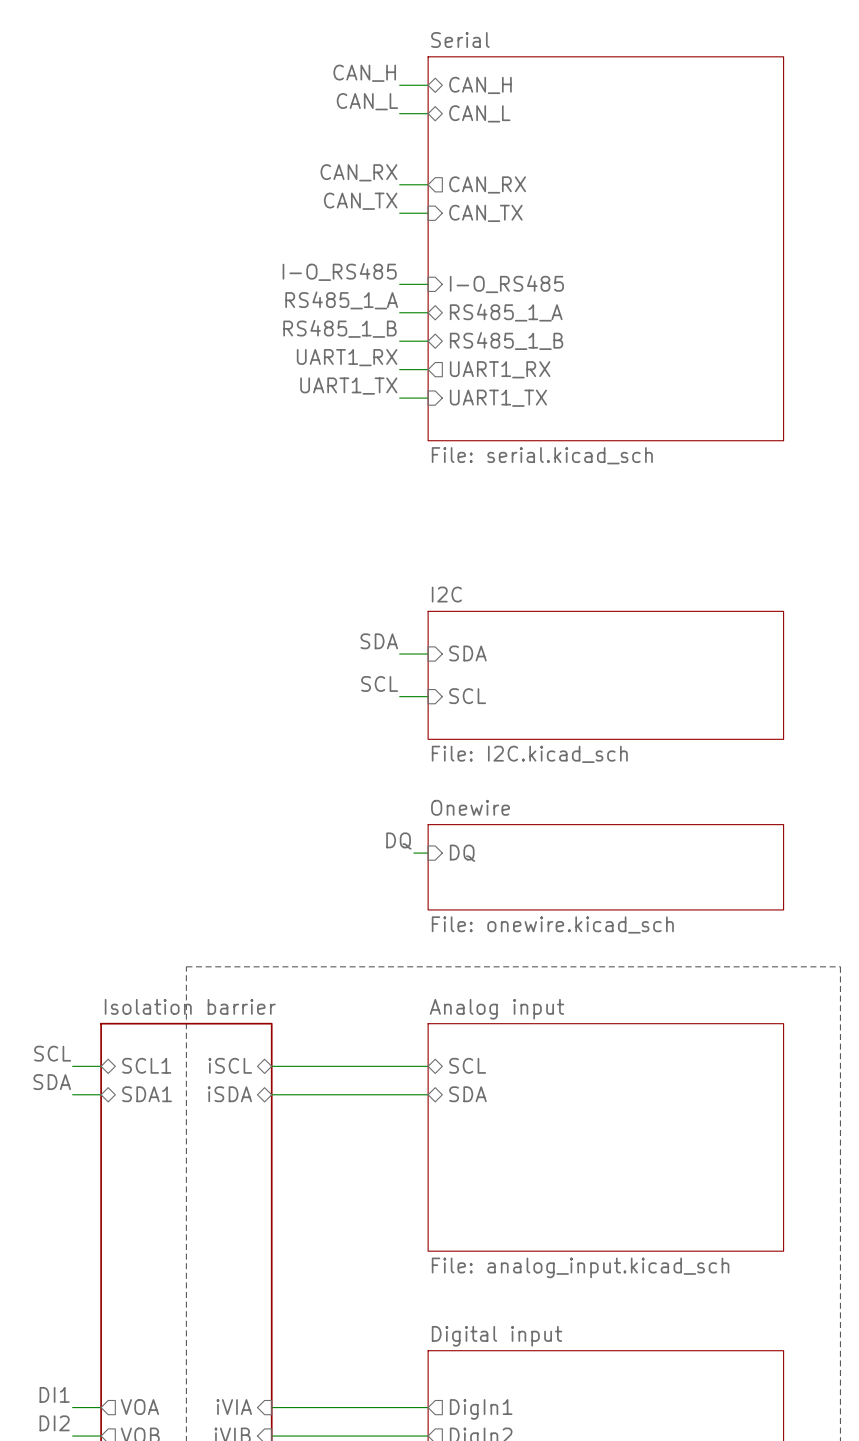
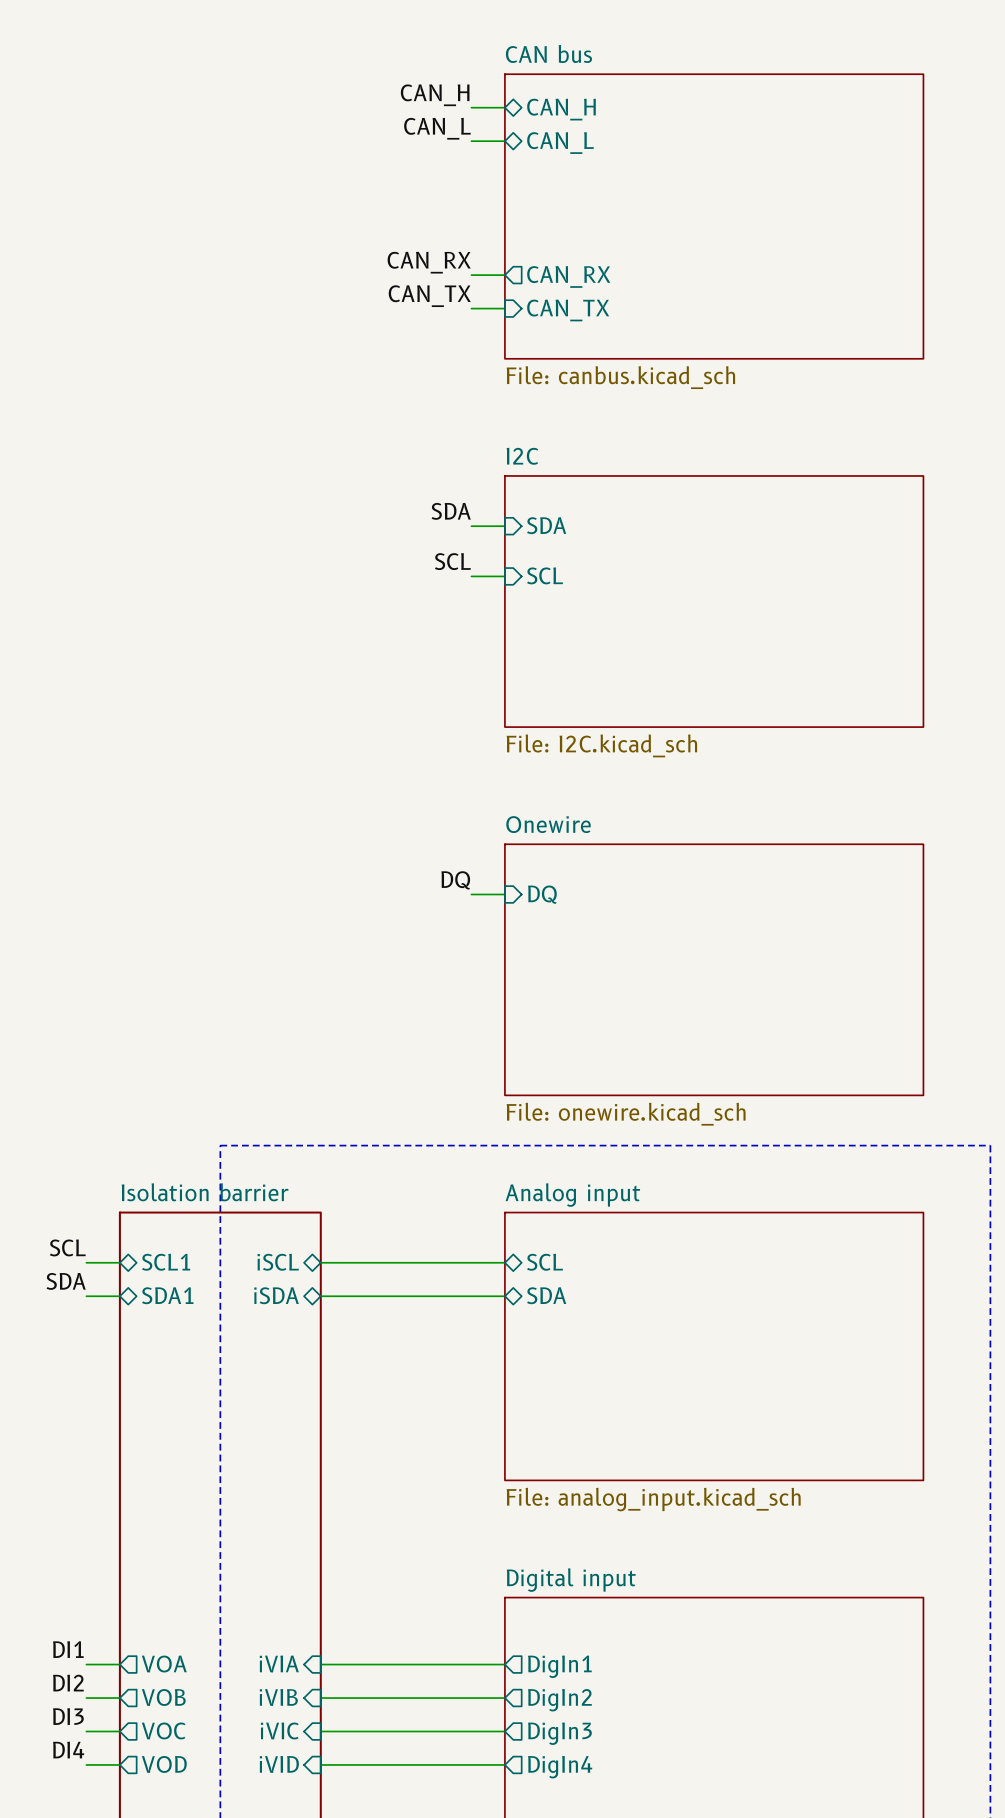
label position: CAN_RX (358, 172) -> CAN_RX (429, 262)
sheet CAN bus: none -> File: canbus.kicad_sch (714, 216)
wire: (399, 184) (428, 184) -> (471, 275) (504, 275)
sheet pin position: CAN_RX (487, 184) -> CAN_RX (568, 276)
label position: CAN_TX (360, 201) -> CAN_TX (429, 296)
wire: (399, 213) (428, 213) -> (471, 308) (504, 308)
sheet pin position: CAN_TX (485, 213) -> CAN_TX (568, 310)
sheet Serial: File: serial.kicad_sch (605, 248) -> none
label: I-O_RS485 (339, 271) -> none
wire: (399, 284) (428, 284) -> none
sheet pin: I-O_RS485 (506, 284) -> none
label: RS485_1_A (341, 300) -> none
wire: (399, 312) (428, 312) -> none
sheet pin: RS485_1_A (506, 312) -> none
label: RS485_1_B (339, 328) -> none
wire: (399, 341) (428, 341) -> none
sheet pin: RS485_1_B (506, 341) -> none
label: UART1_RX (347, 357) -> none
wire: (399, 369) (428, 369) -> none
sheet pin: UART1_RX (500, 369) -> none
label: UART1_TX (348, 386) -> none
wire: (399, 398) (428, 398) -> (471, 526) (504, 526)
sheet pin: UART1_TX (498, 398) -> none
sheet I2C name position: I2C (446, 594) -> I2C (522, 456)
sheet I2C shape: [428, 611, 784, 740] -> [504, 475, 924, 728]
label position: SDA (379, 641) -> SDA (451, 511)
sheet pin position: SDA (467, 653) -> SDA (546, 525)
wire: (399, 654) (428, 654) -> (471, 894) (504, 894)
label position: SCL (379, 683) -> SCL (452, 561)
wire: (399, 696) (428, 696) -> (471, 576) (504, 576)
sheet pin position: SCL (467, 696) -> SCL (545, 575)
sheet I2C value position: File: I2C.kicad_sch (529, 754) -> File: I2C.kicad_sch (601, 745)
sheet Onewire: none -> File: onewire.kicad_sch (714, 969)
label position: DQ (398, 841) -> DQ (455, 880)
wire: (413, 853) (428, 853) -> none
sheet pin position: DQ (462, 853) -> DQ (542, 894)
sheet Onewire: File: onewire.kicad_sch (605, 867) -> none

